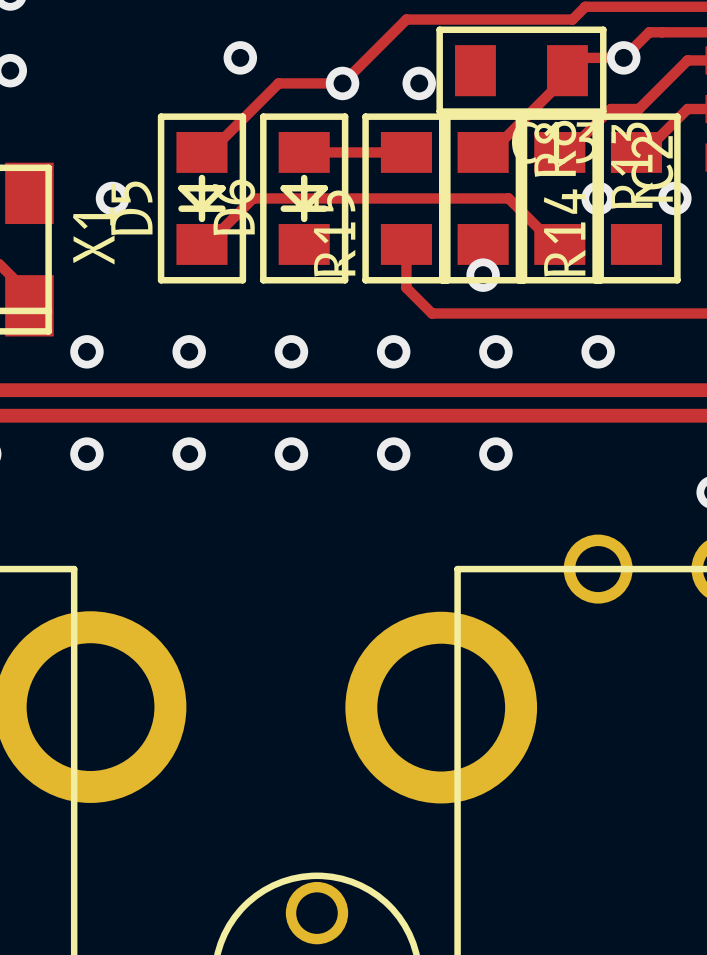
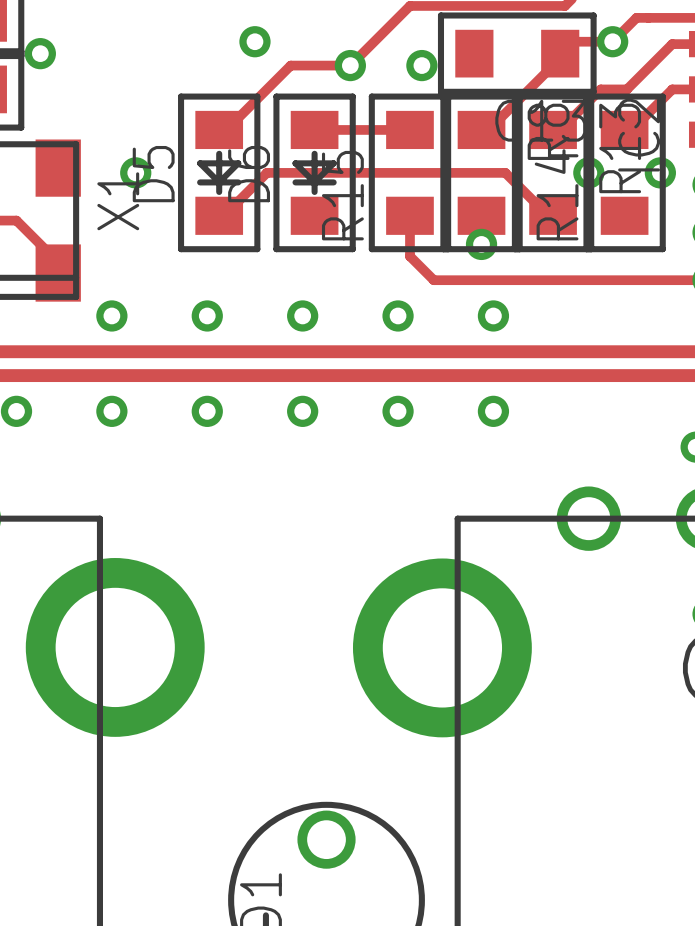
via: (598, 351) -> none

